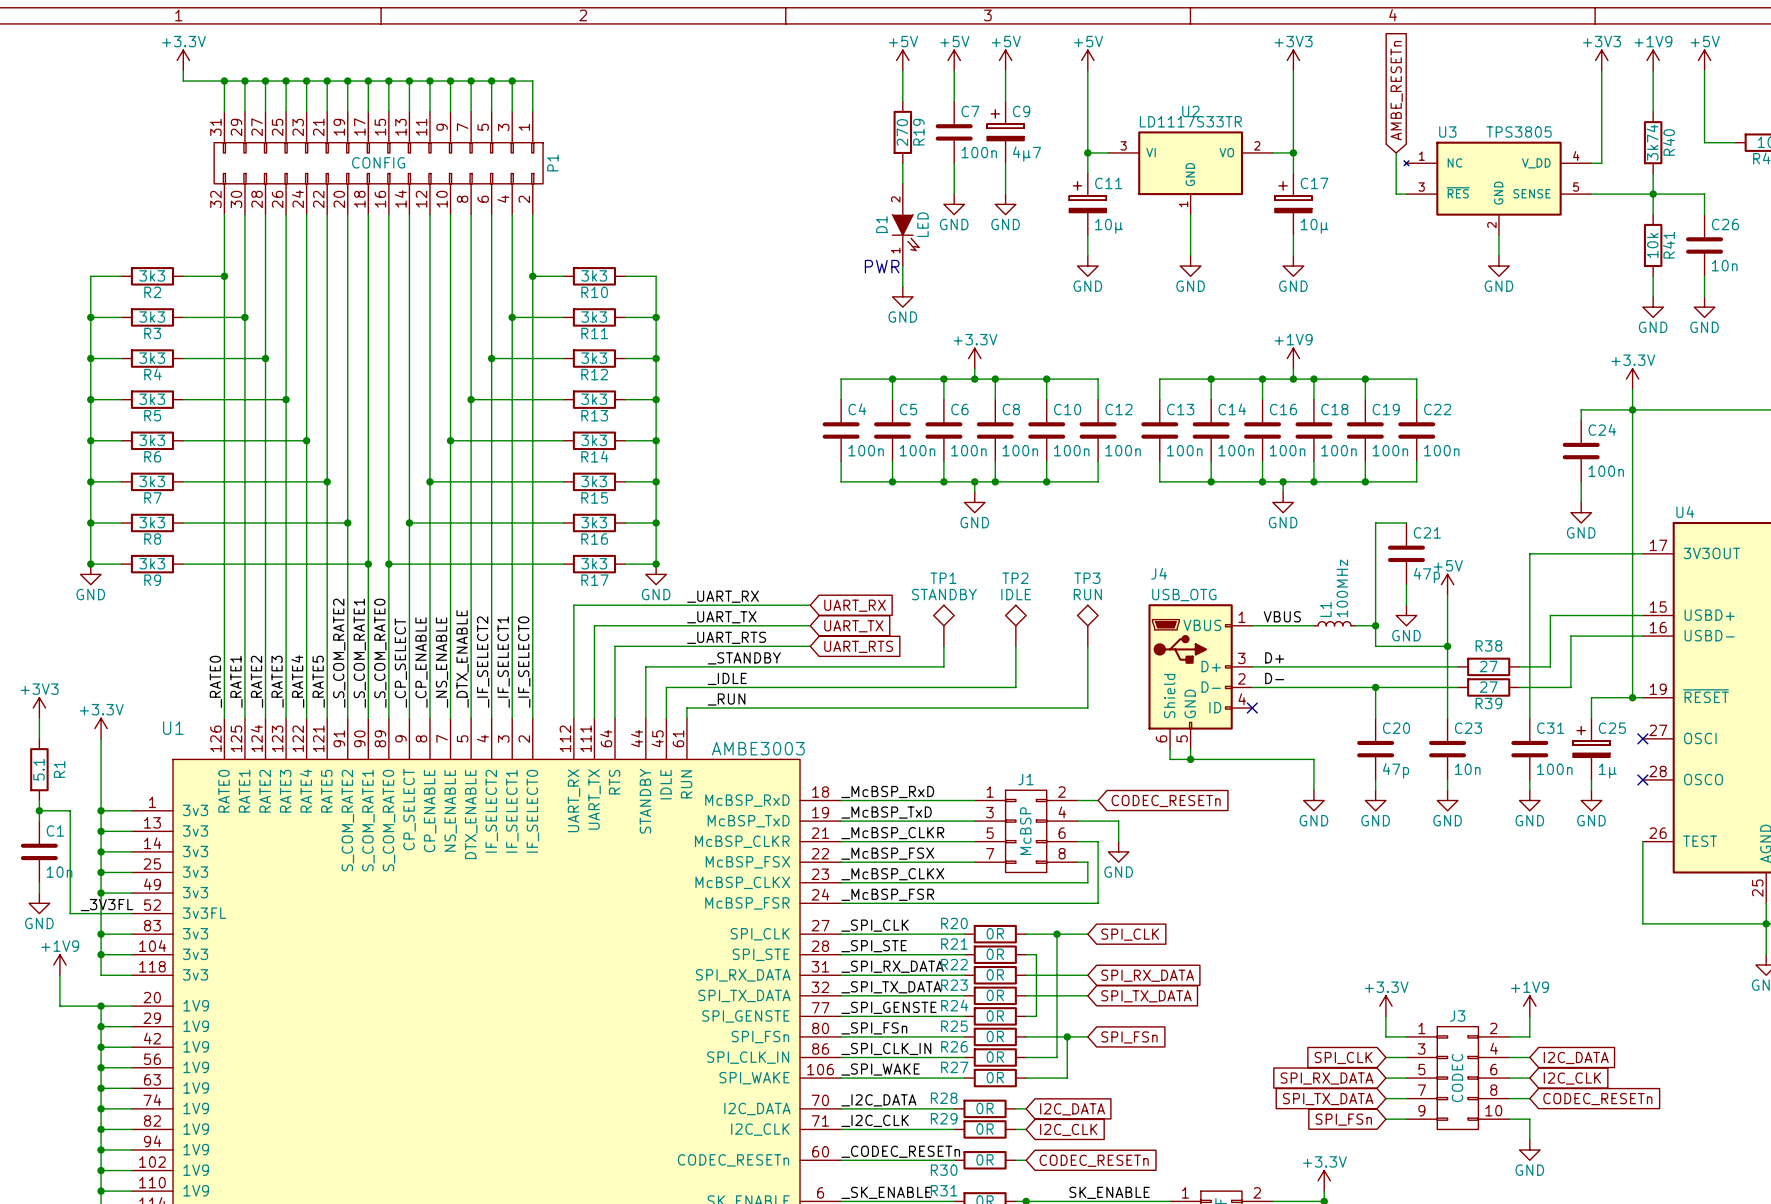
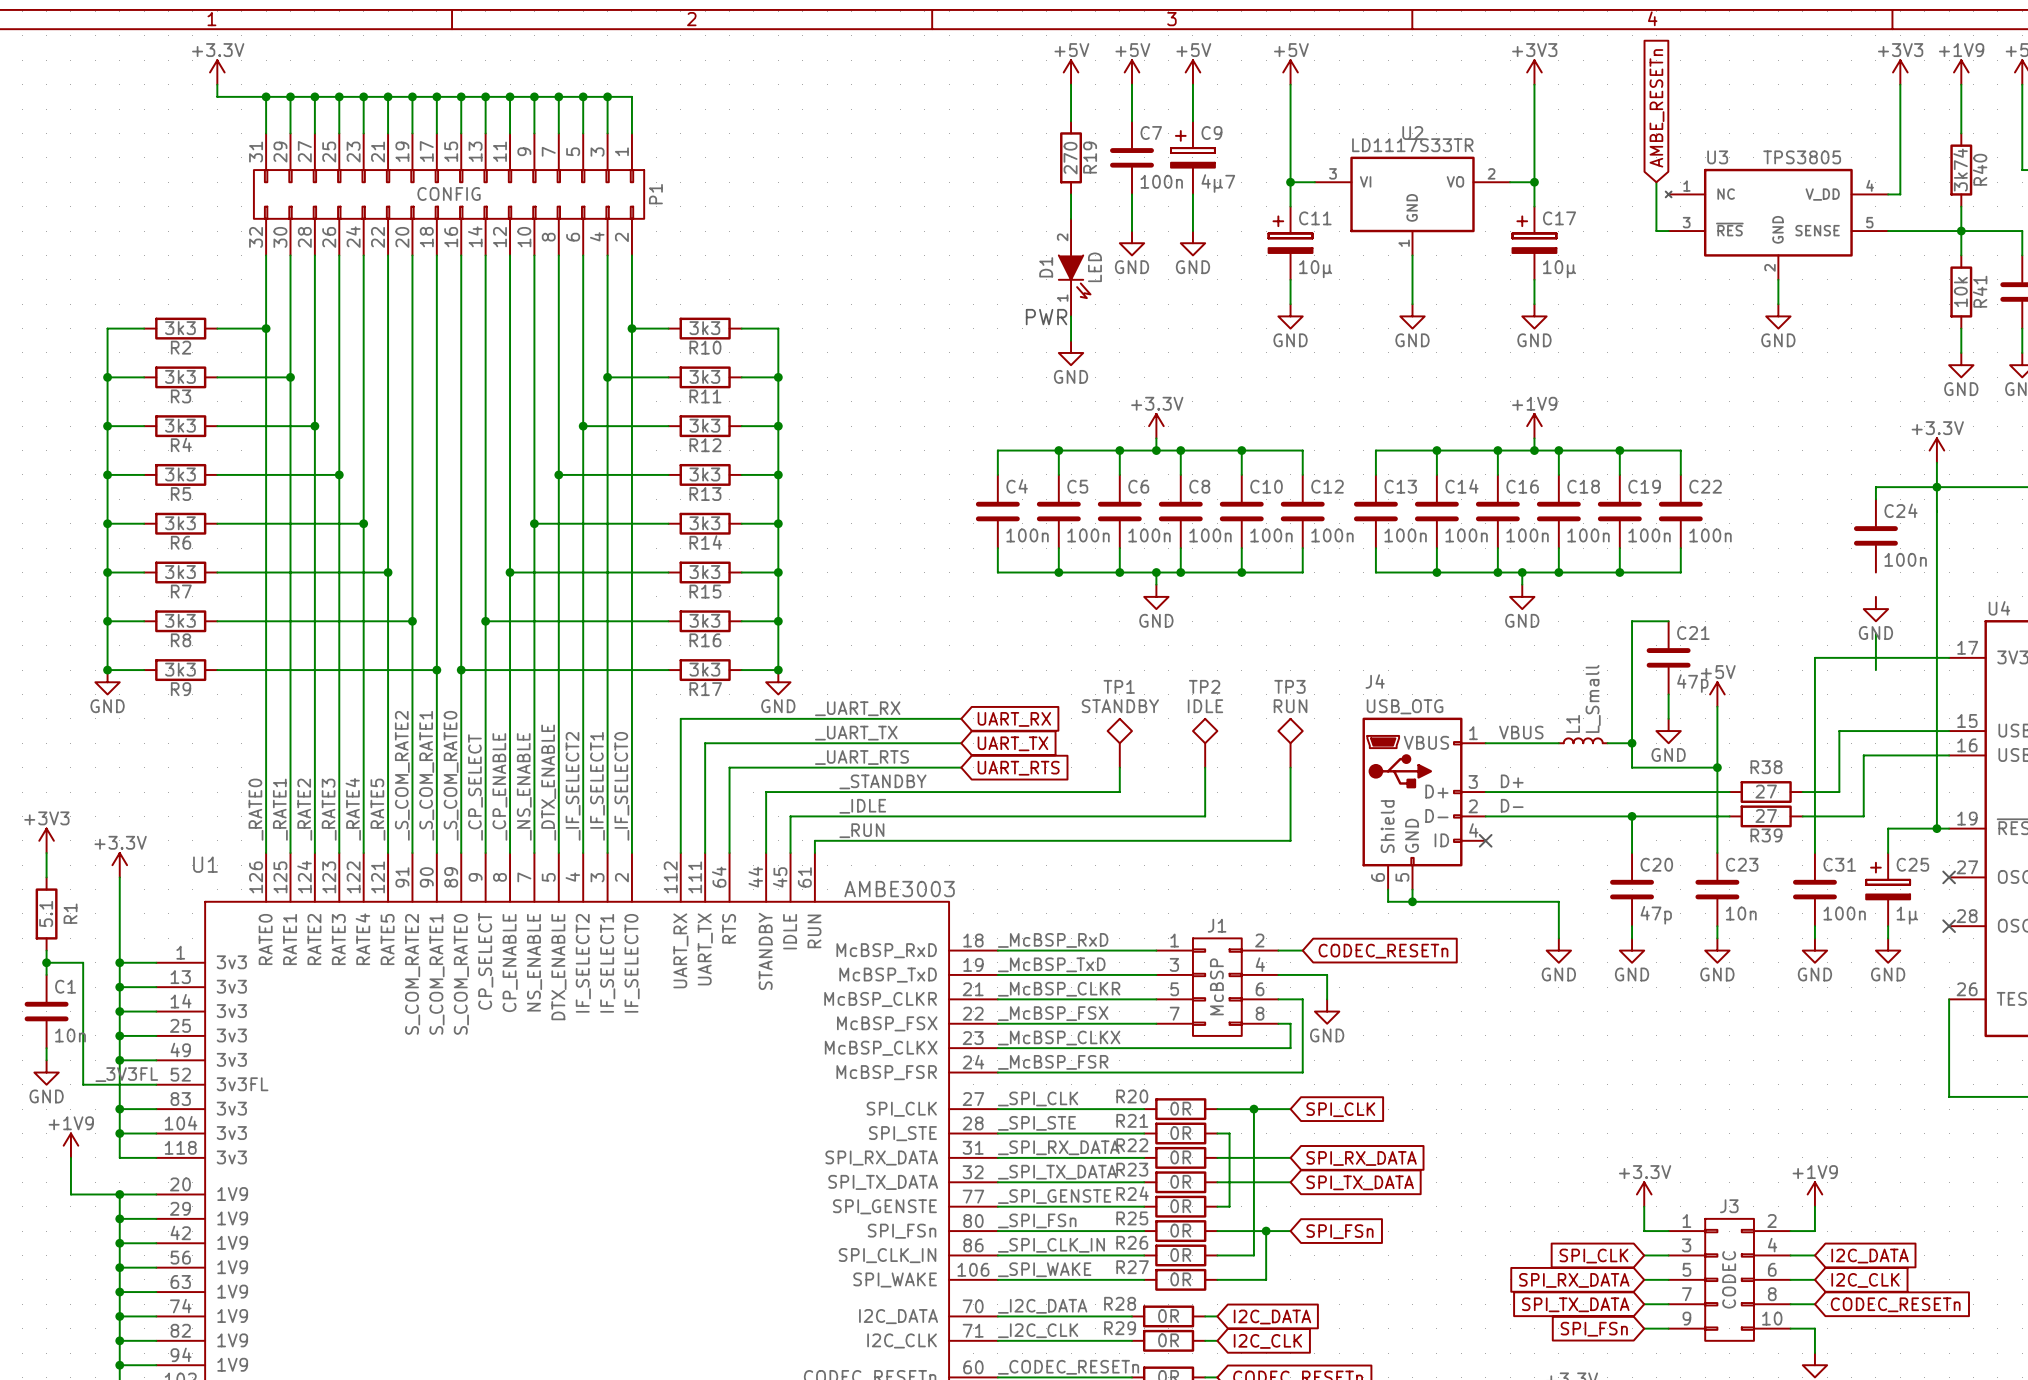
wire: (1581, 481) (1581, 502) -> none
wire: none -> (1875, 633) (1875, 670)
L1 value: 100MHz (1342, 588) -> L_Small (1593, 698)

